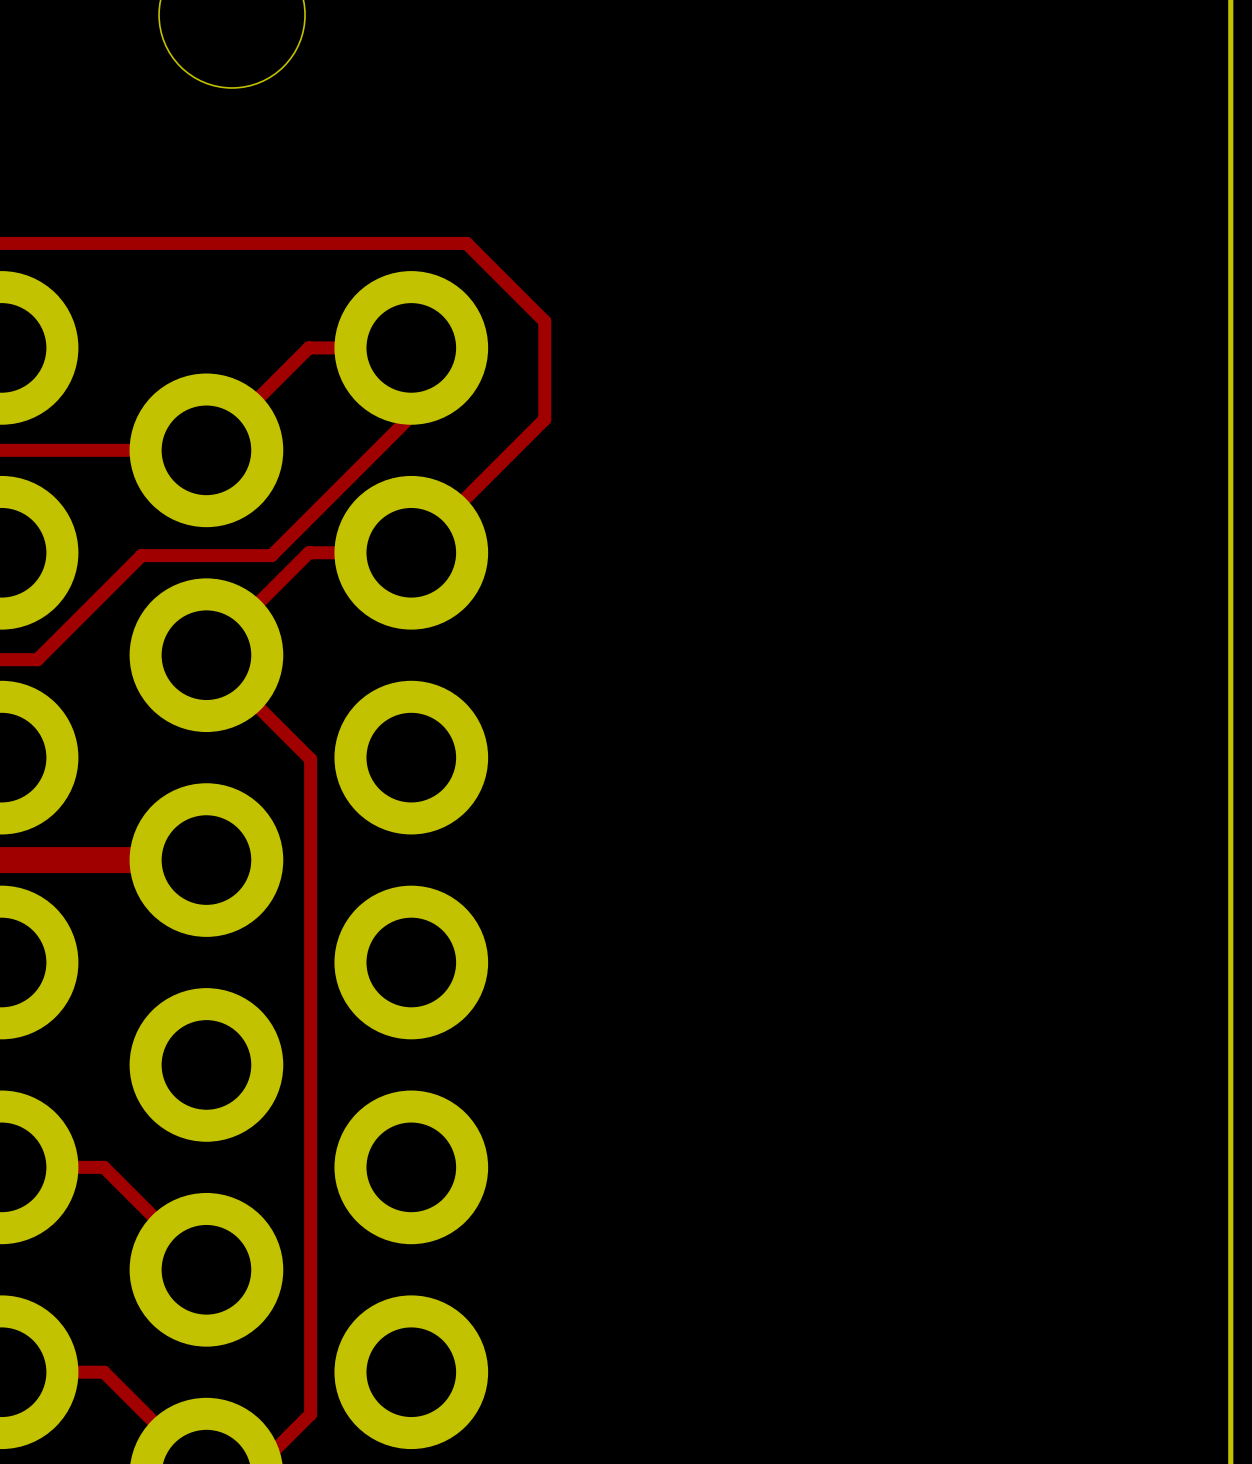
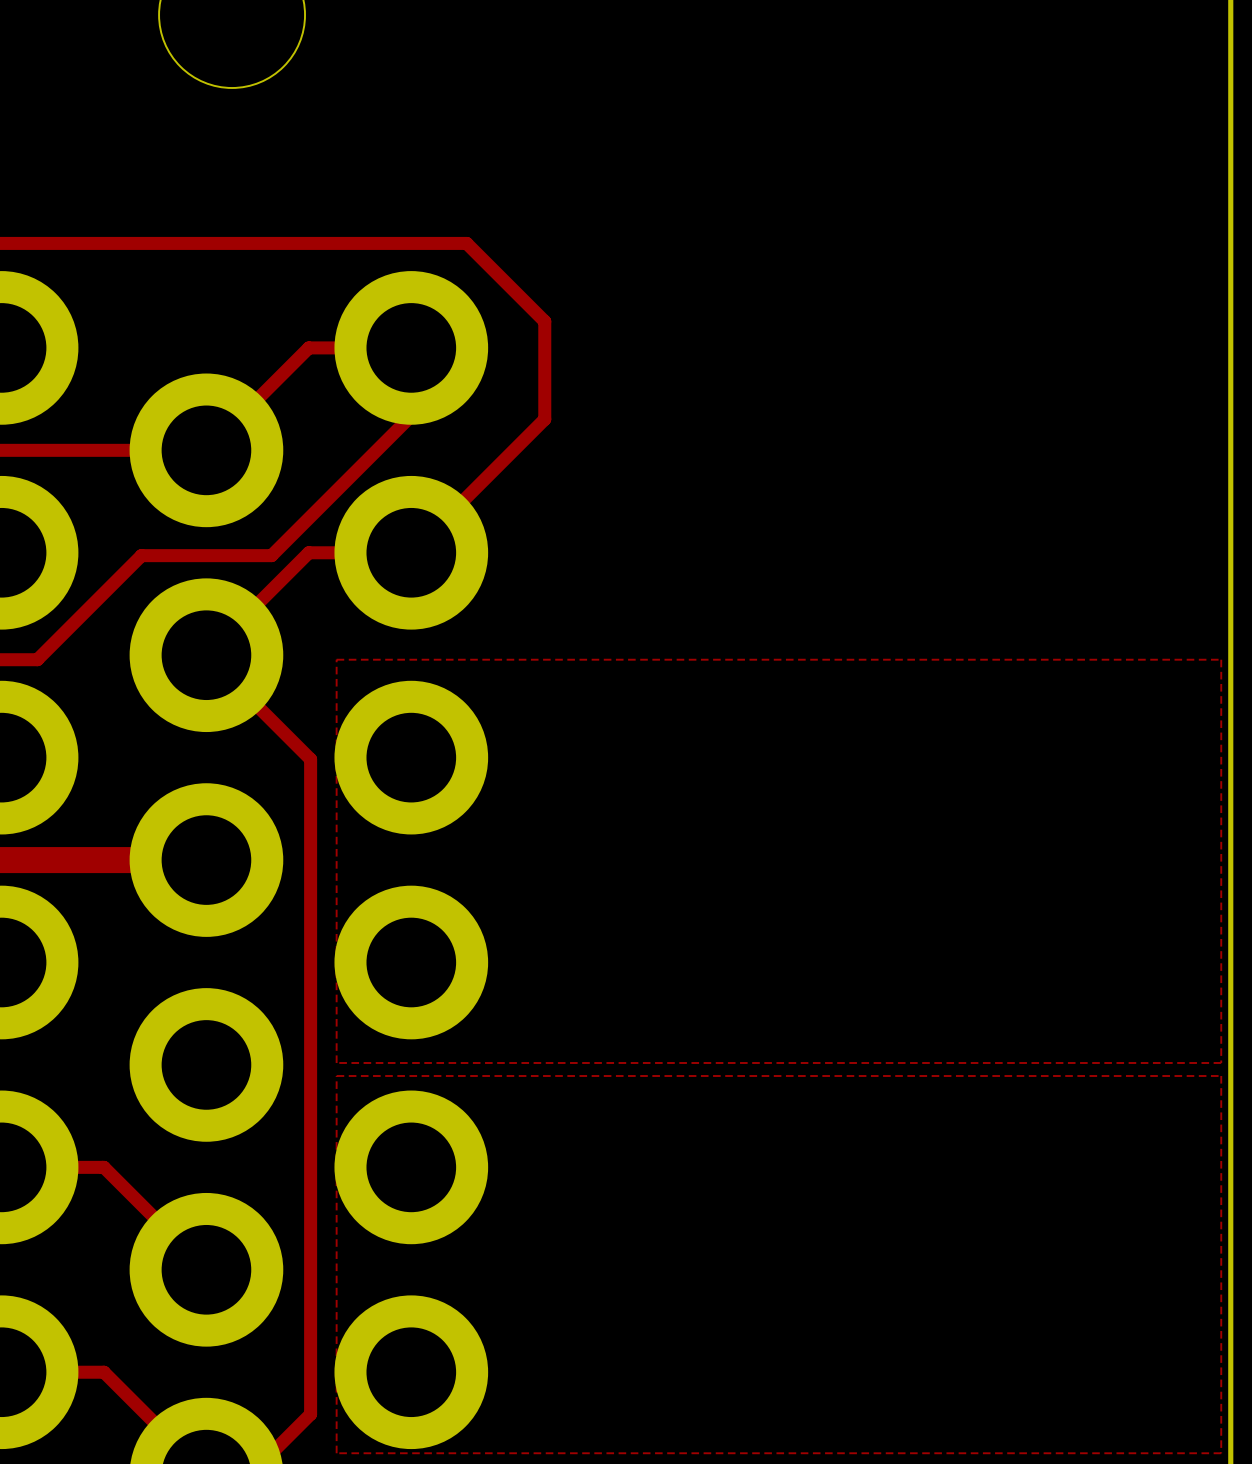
zone outline: none -> (336, 659) (1221, 659) (1221, 1062) (336, 1062) (336, 659)
zone outline: none -> (336, 1075) (336, 1453) (1221, 1453) (1221, 1075) (336, 1075)

